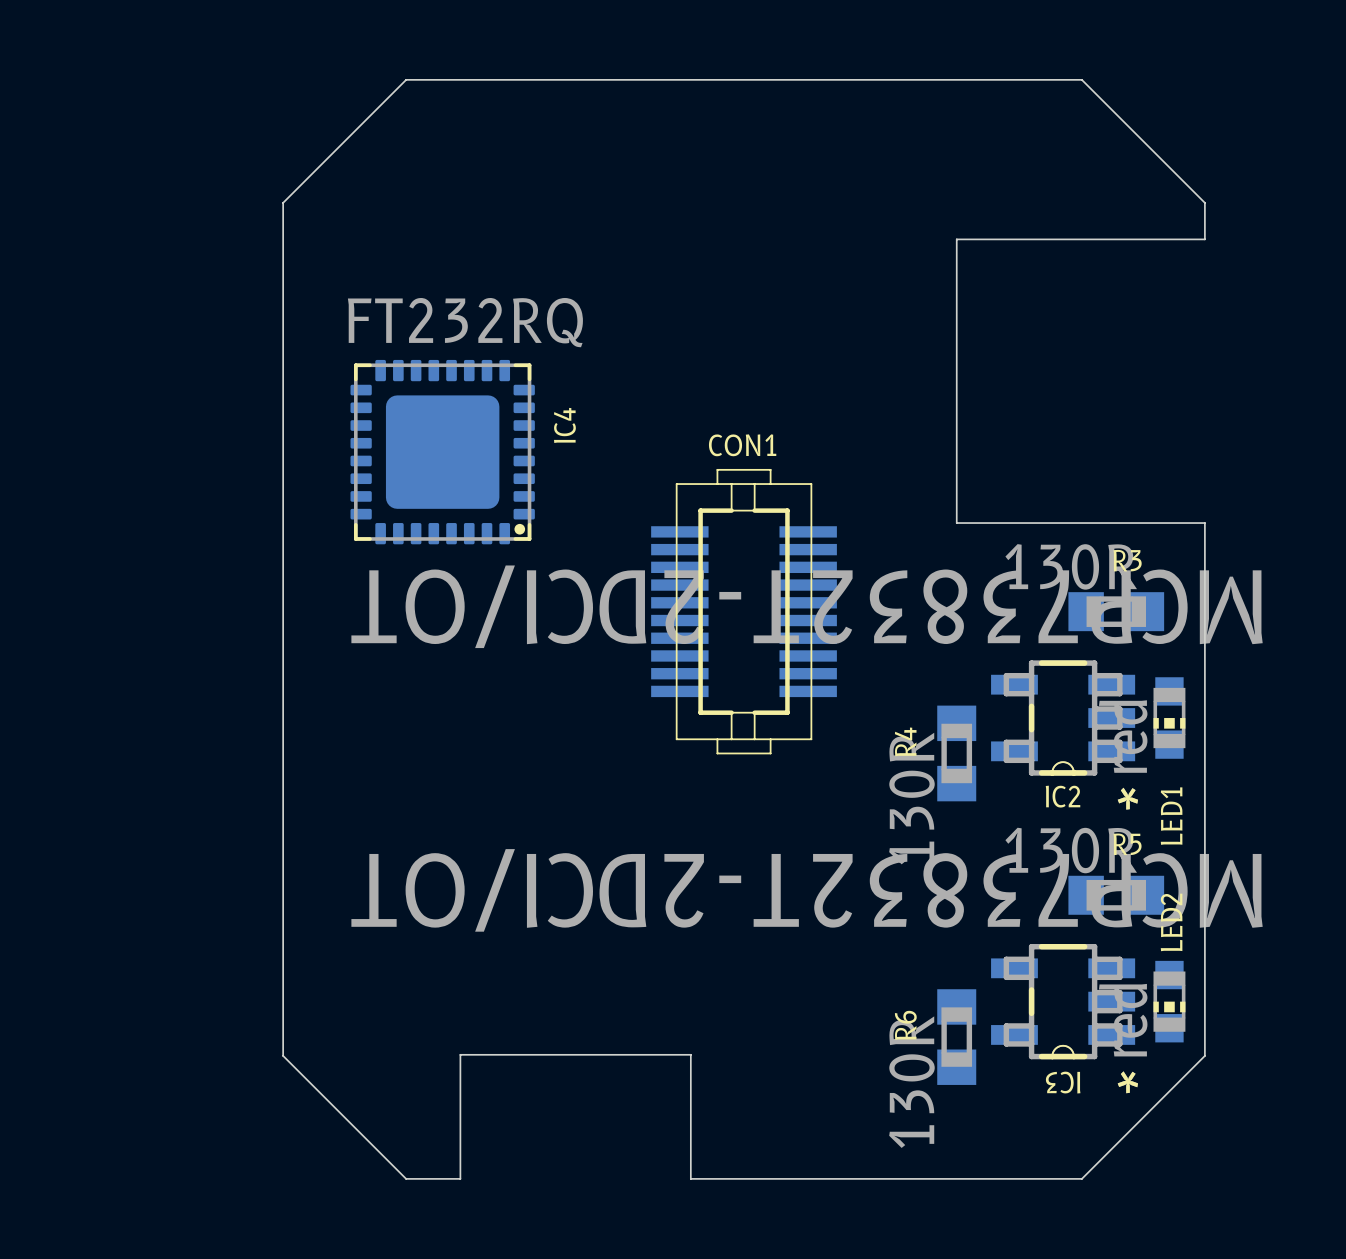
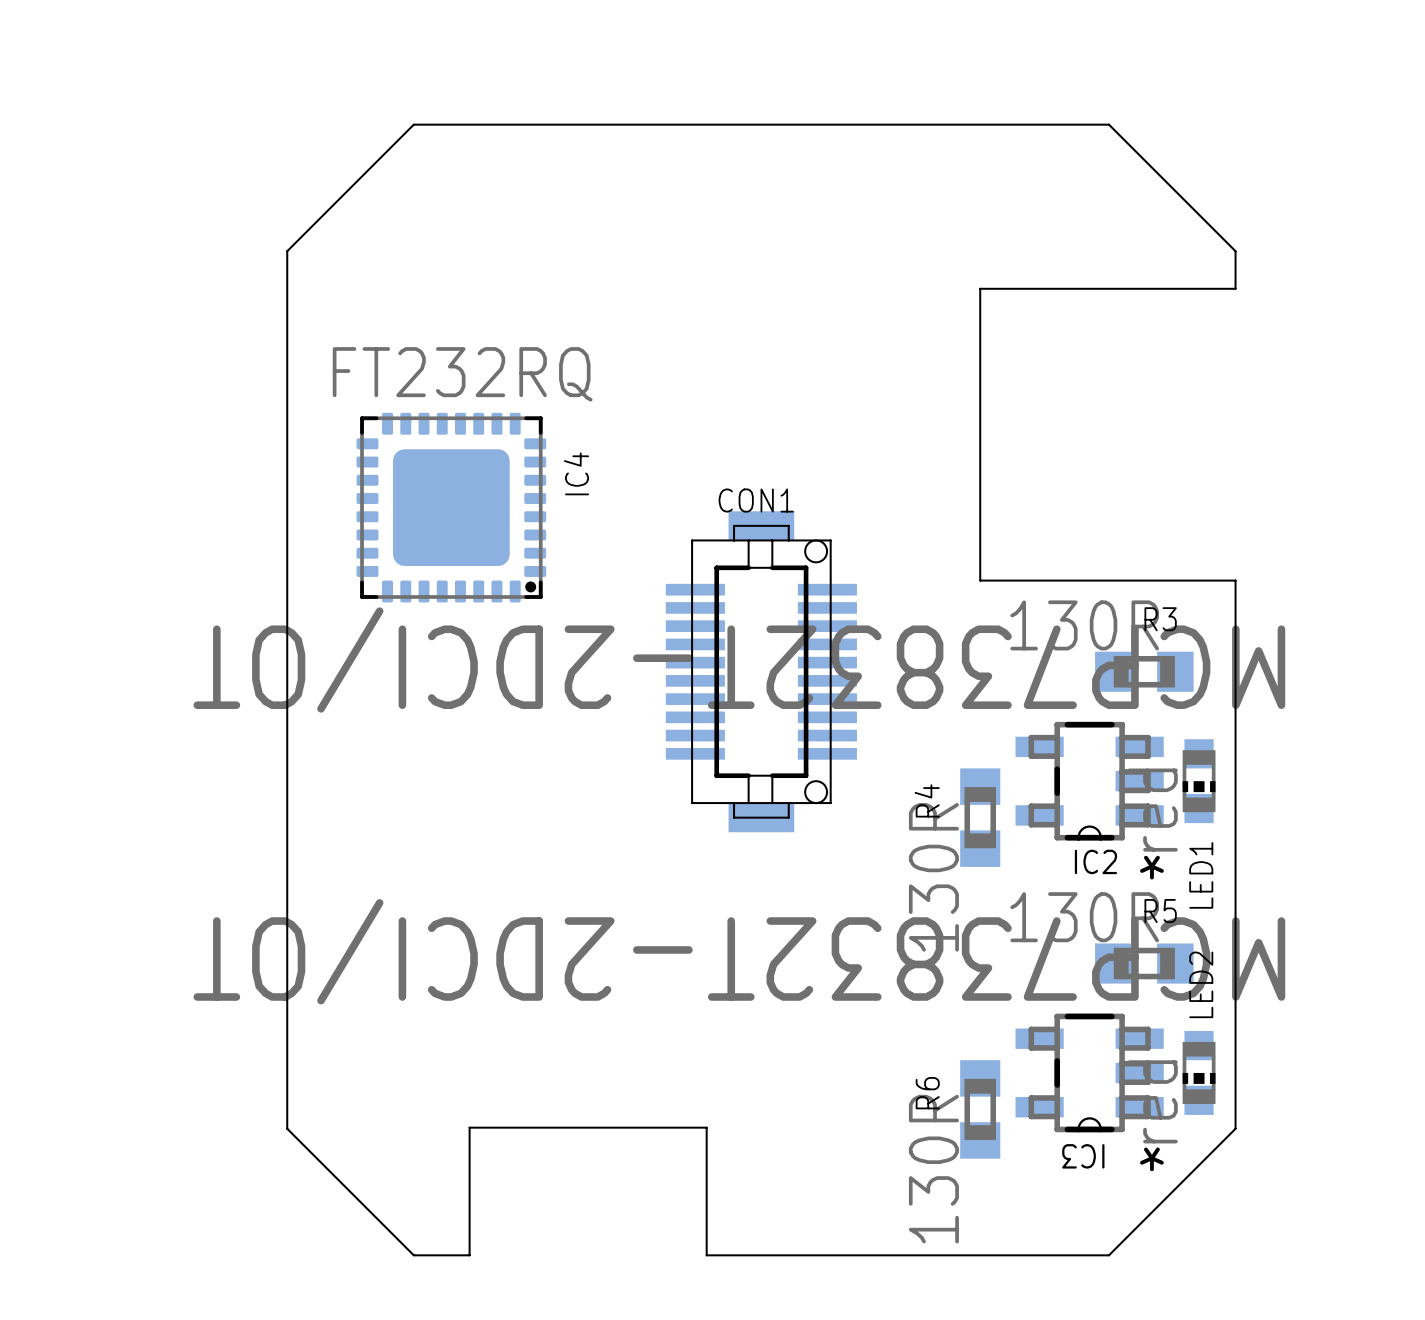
CON1 footprint: [651, 468, 837, 755] -> [665, 511, 857, 833]

